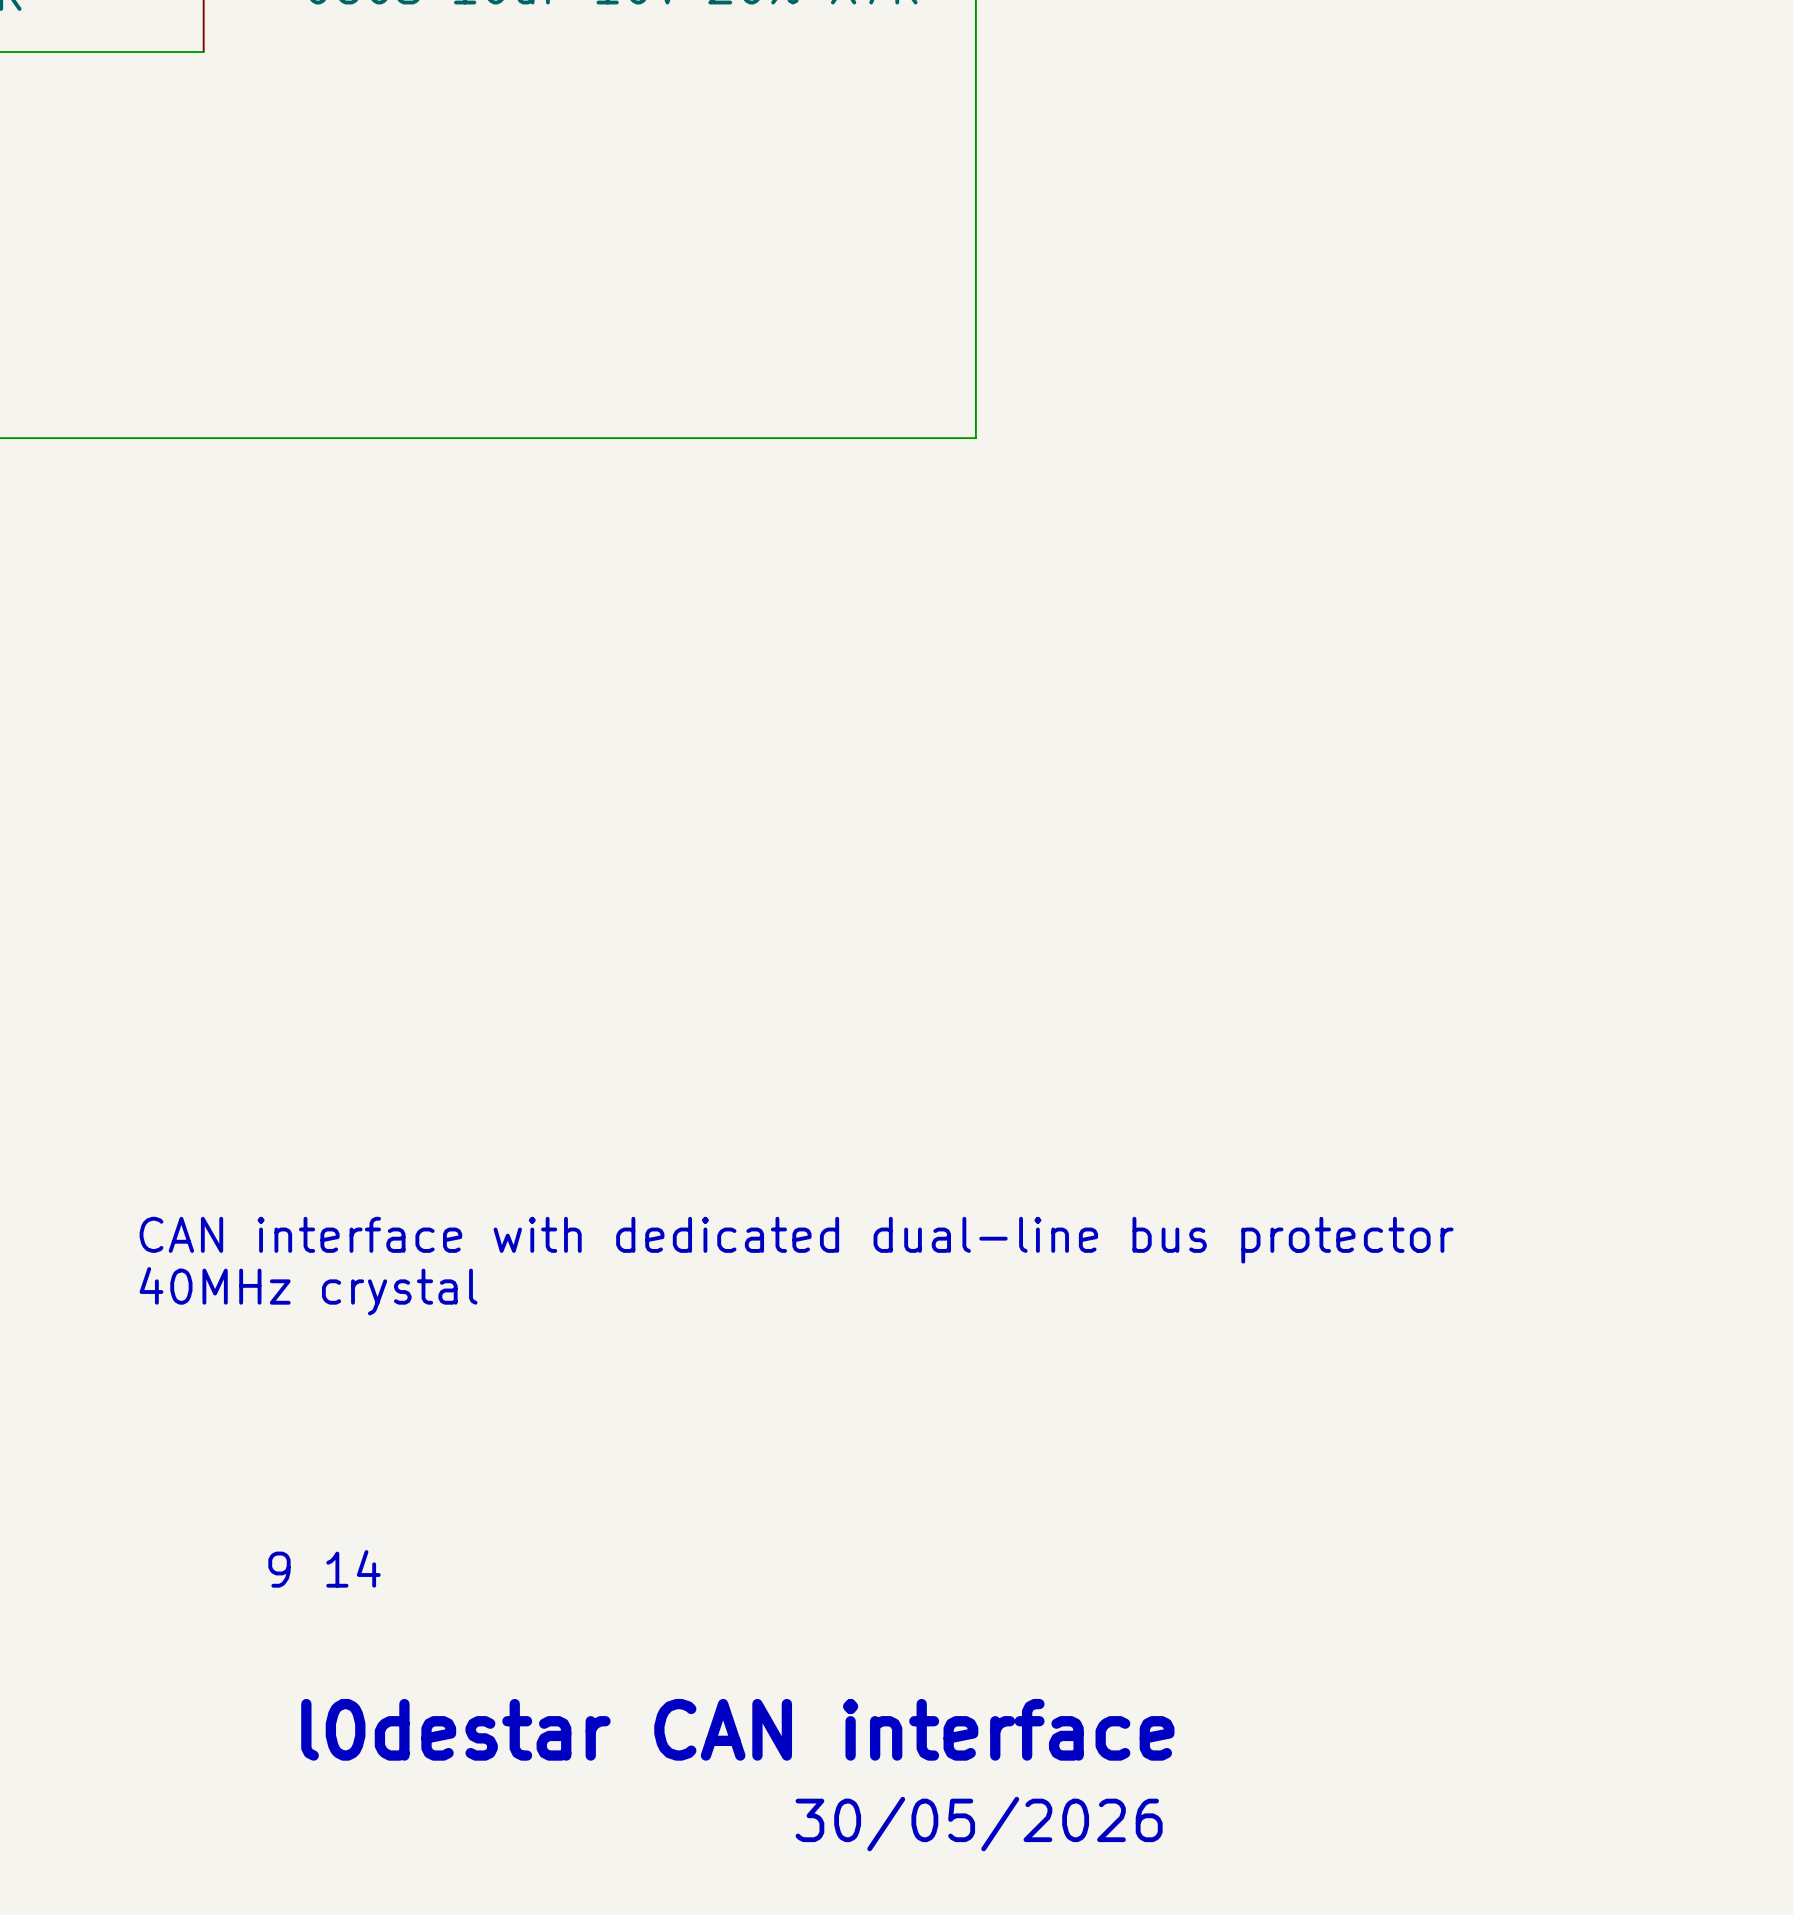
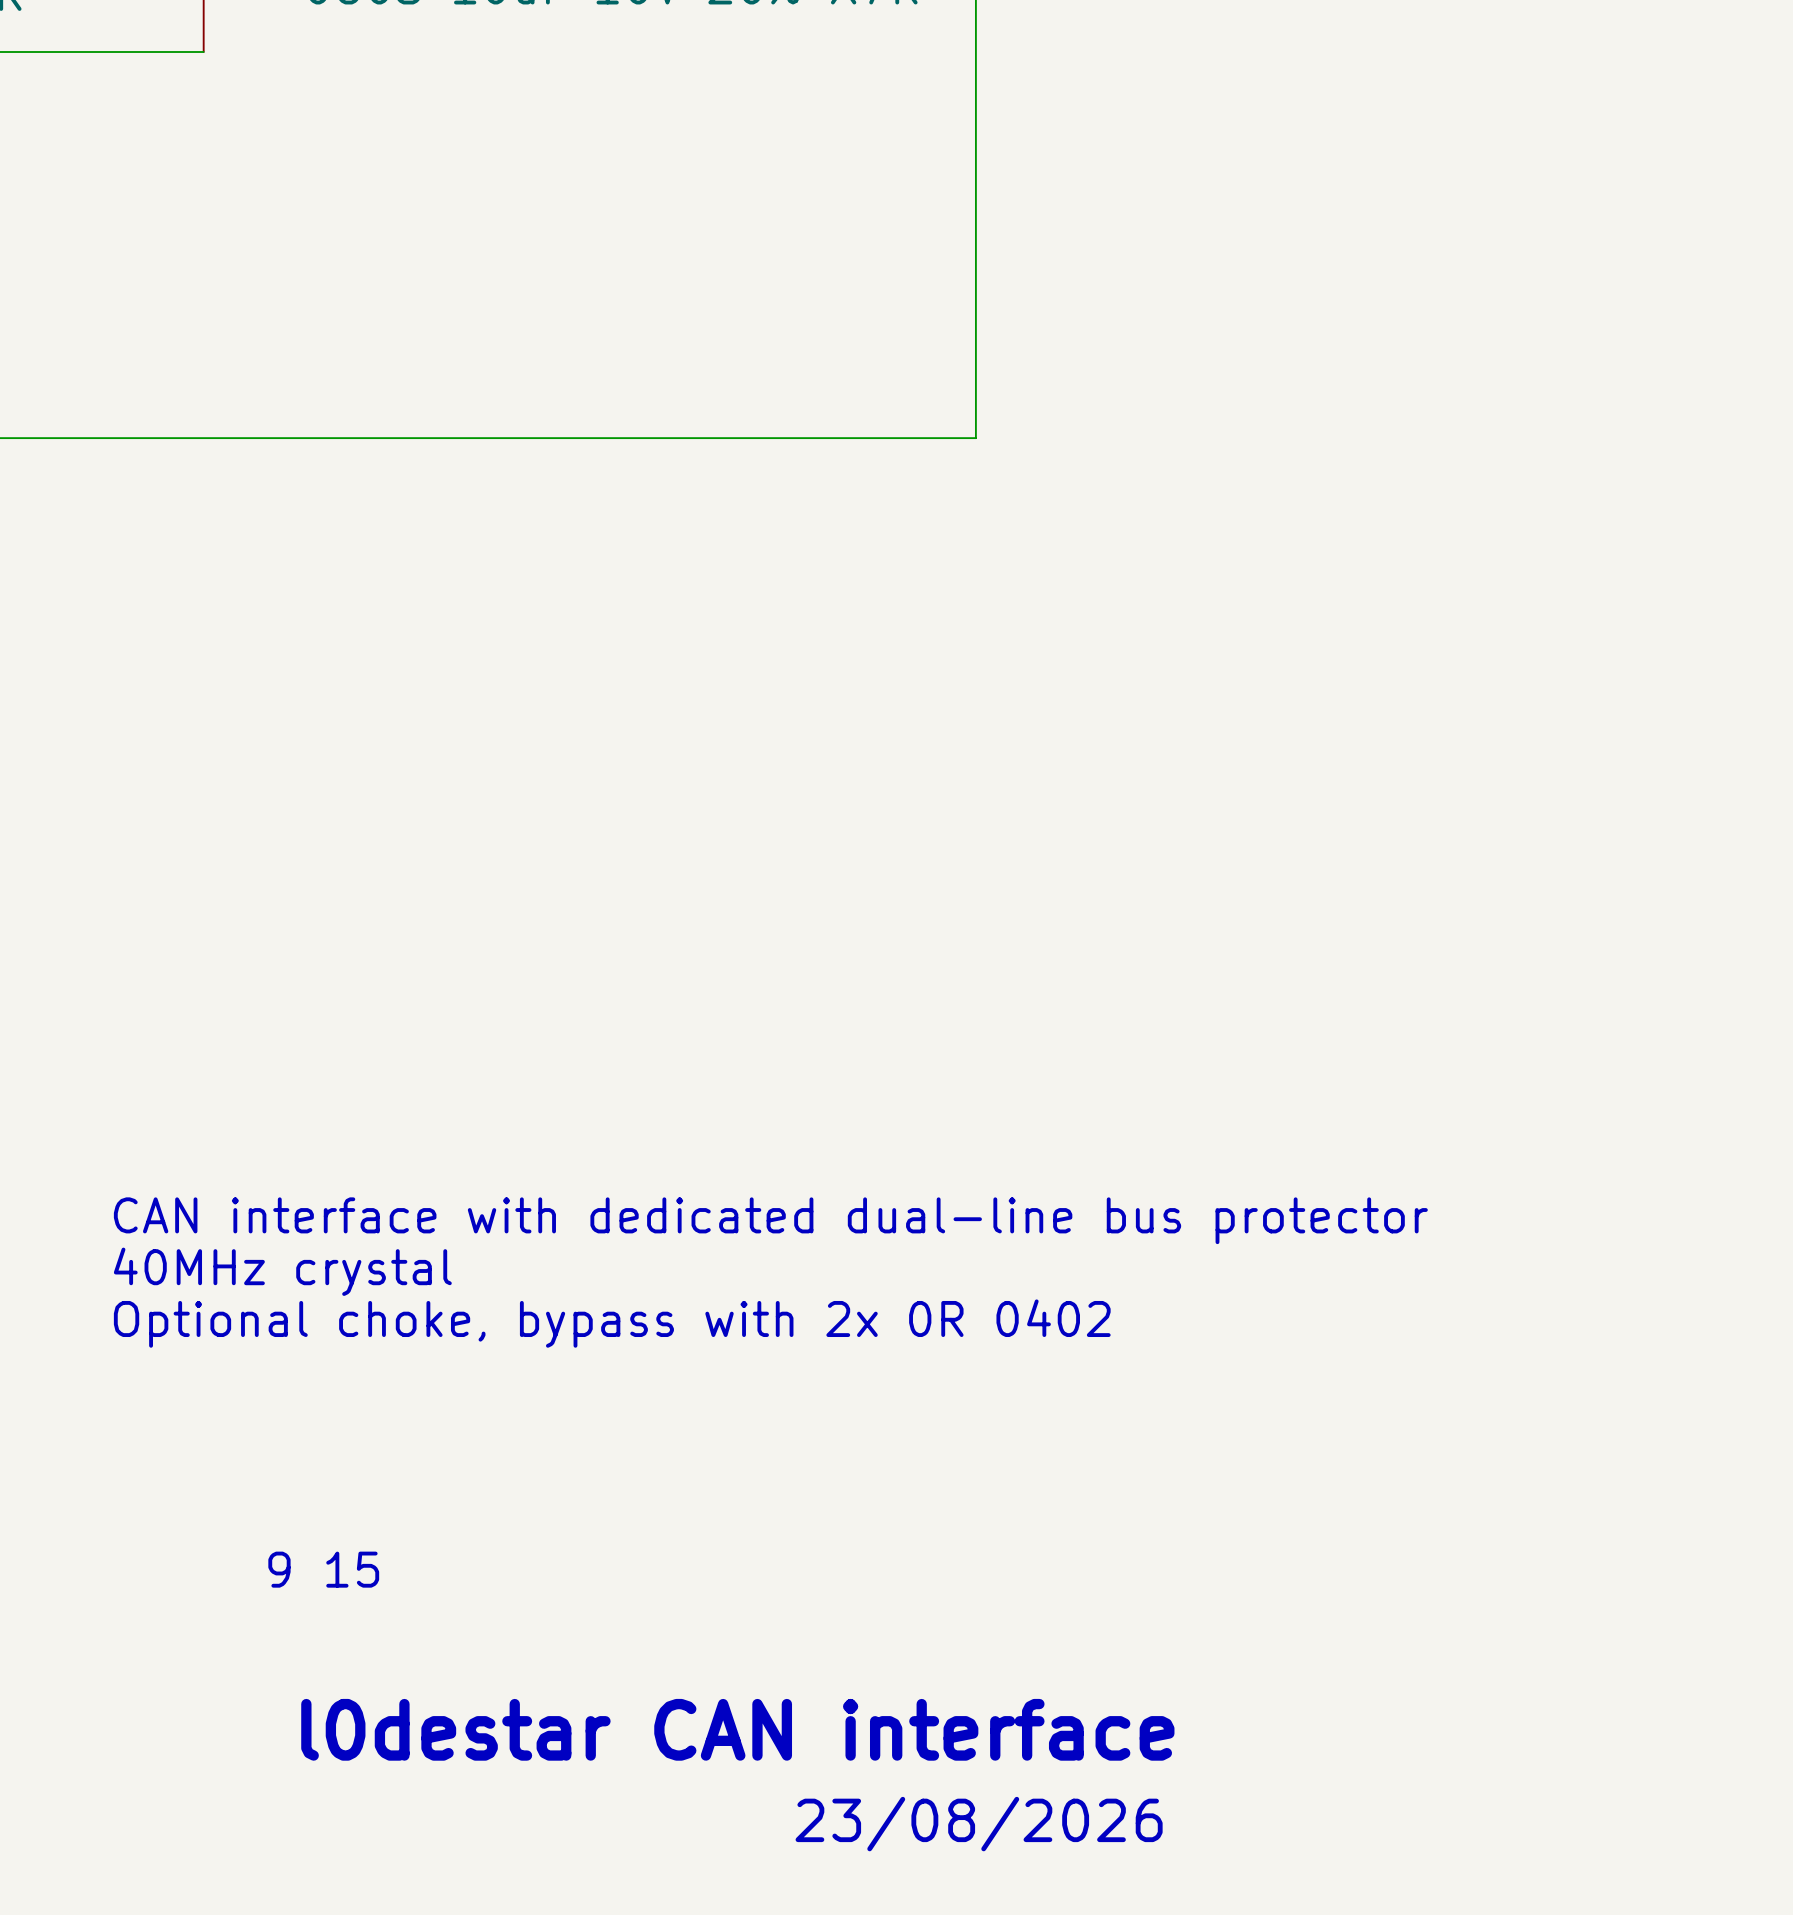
text position: CAN interface with dedicated dual-line bus protector (796, 1240) -> CAN interface with dedicated dual-line bus protector (770, 1220)
text position: 40MHz crystal (308, 1291) -> 40MHz crystal (282, 1271)
text: none -> Optional choke, bypass with 2x 0R 0402 (612, 1323)
text: 14 (353, 1568) -> 15 (352, 1569)
text: 30/05/2026 (979, 1824) -> 23/08/2026 (979, 1824)

